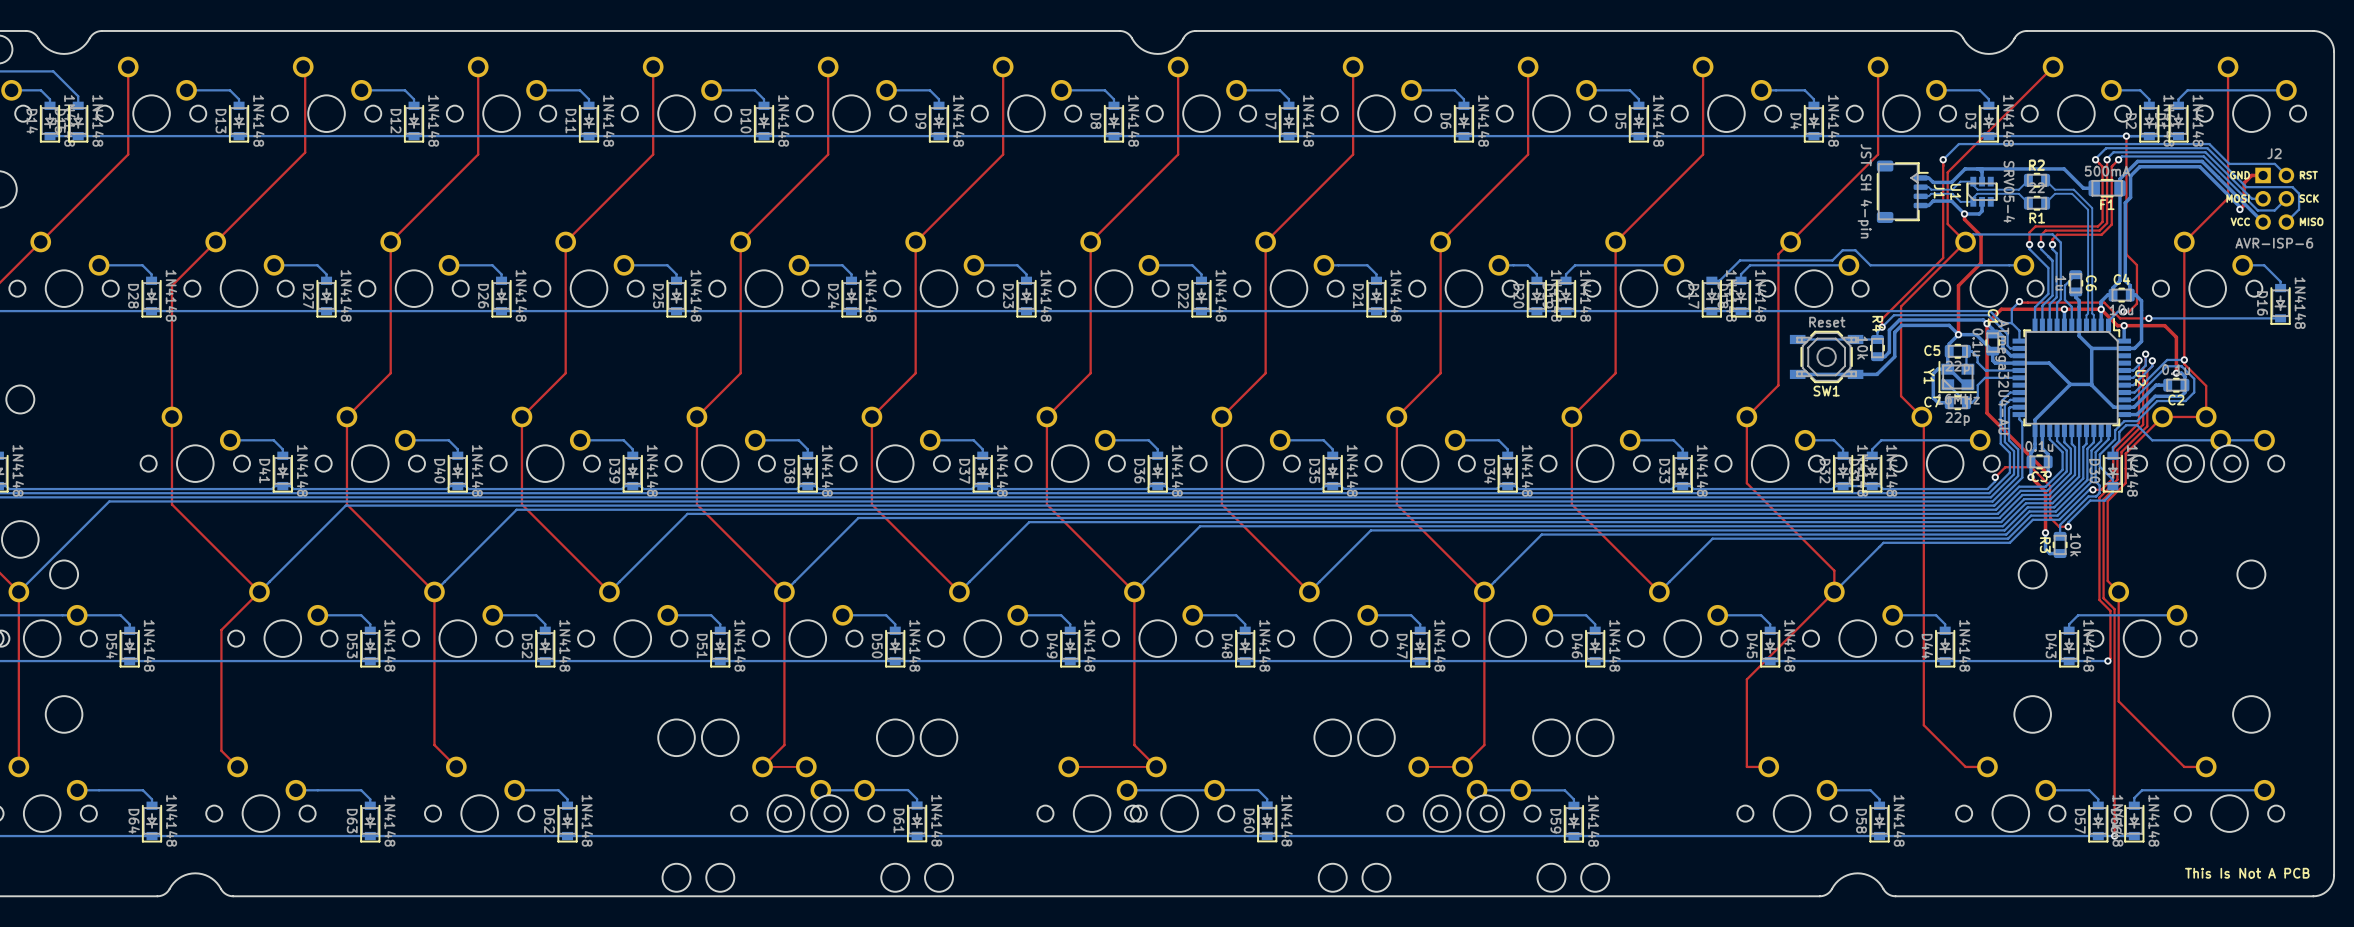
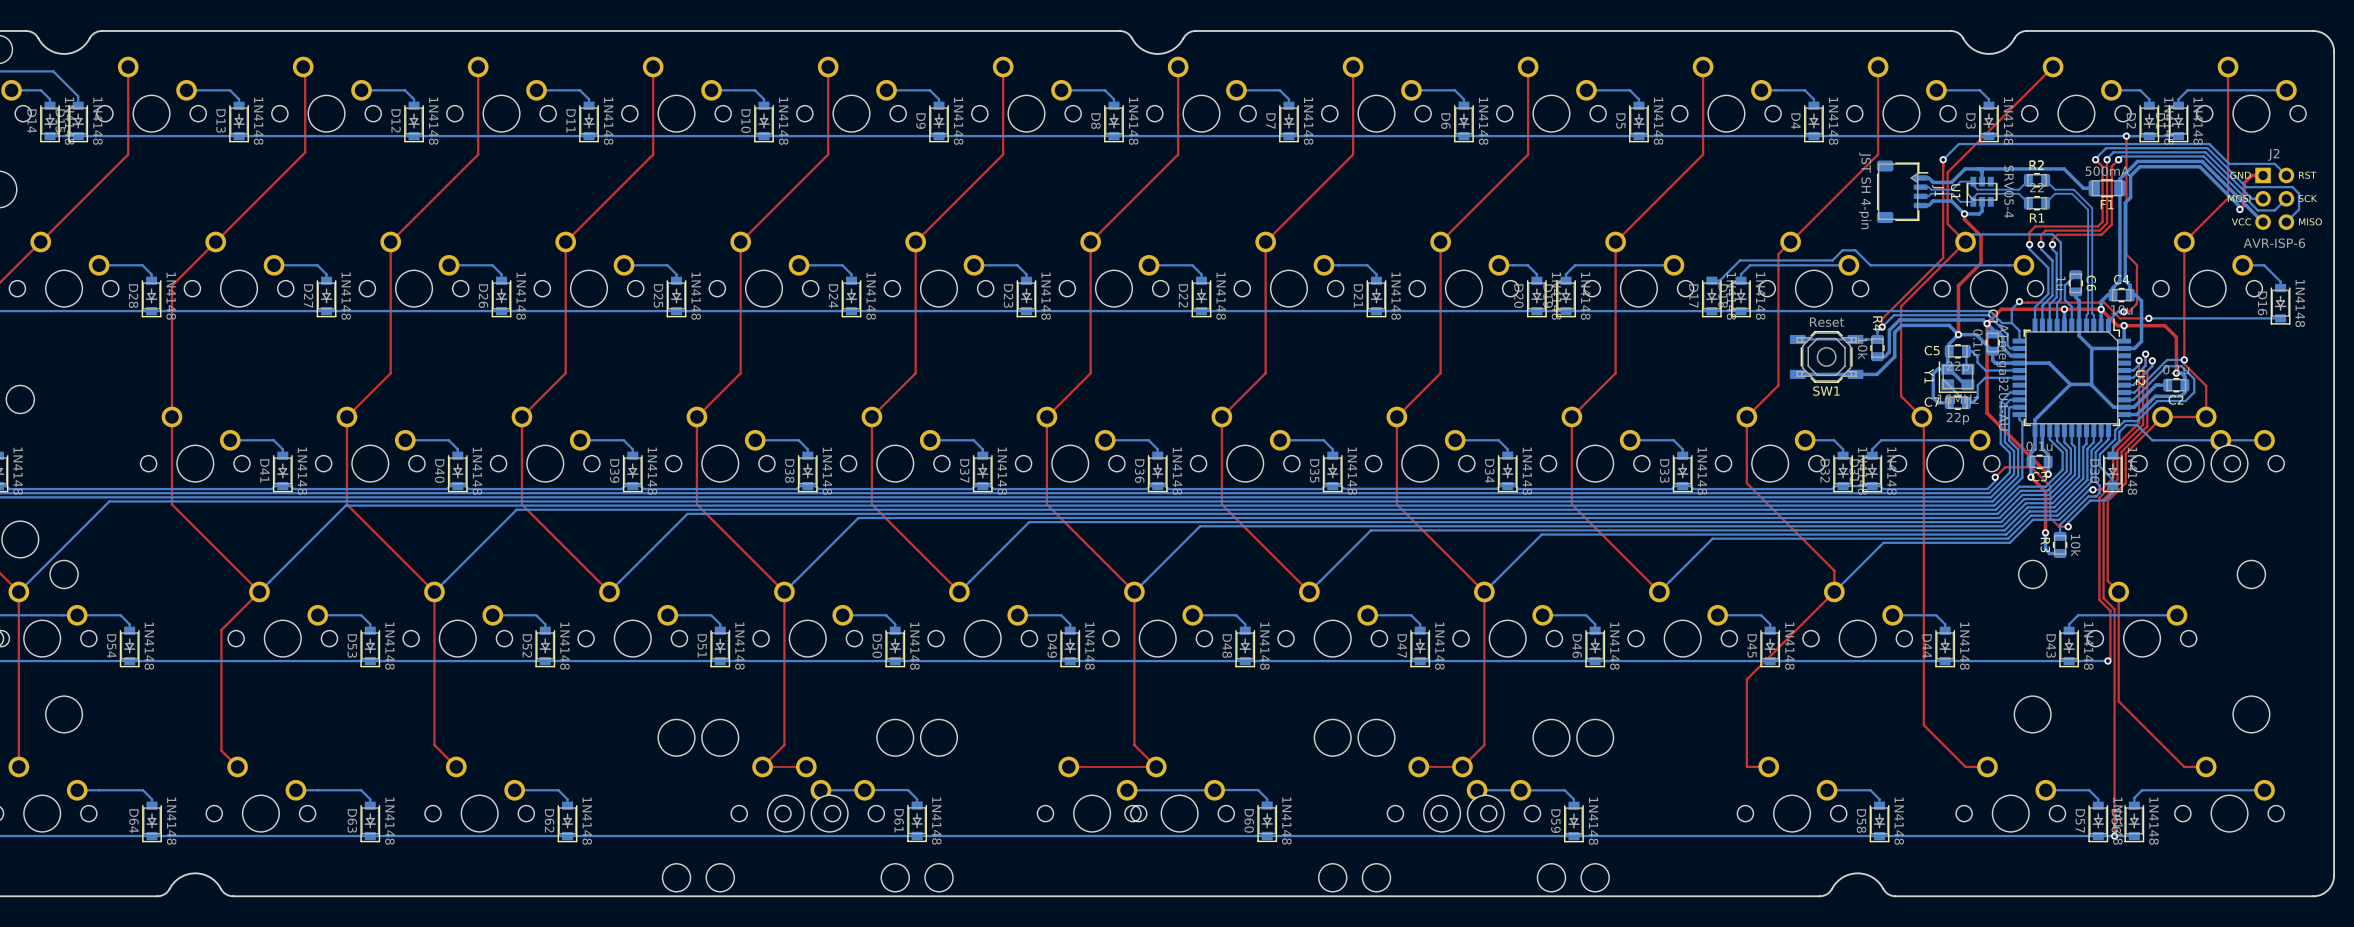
text: This Is Not A PCB (2247, 873) -> none

